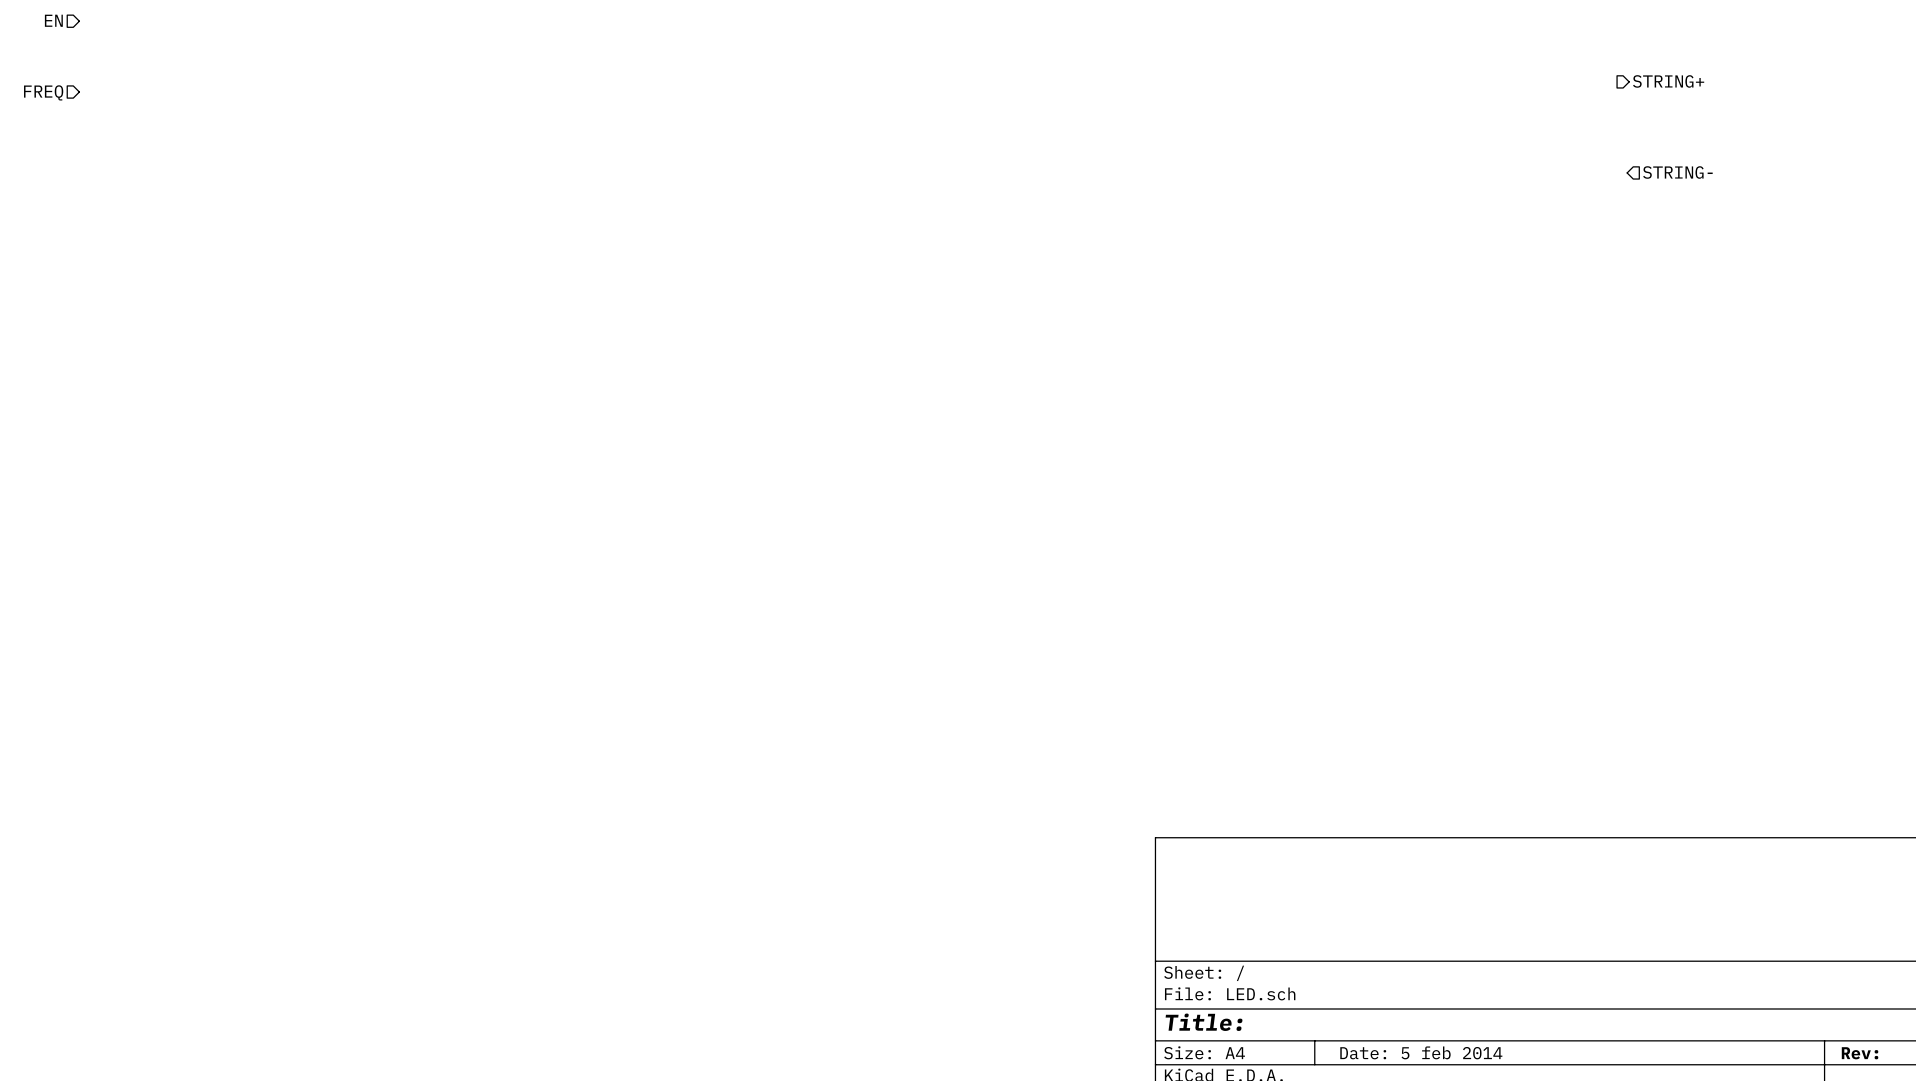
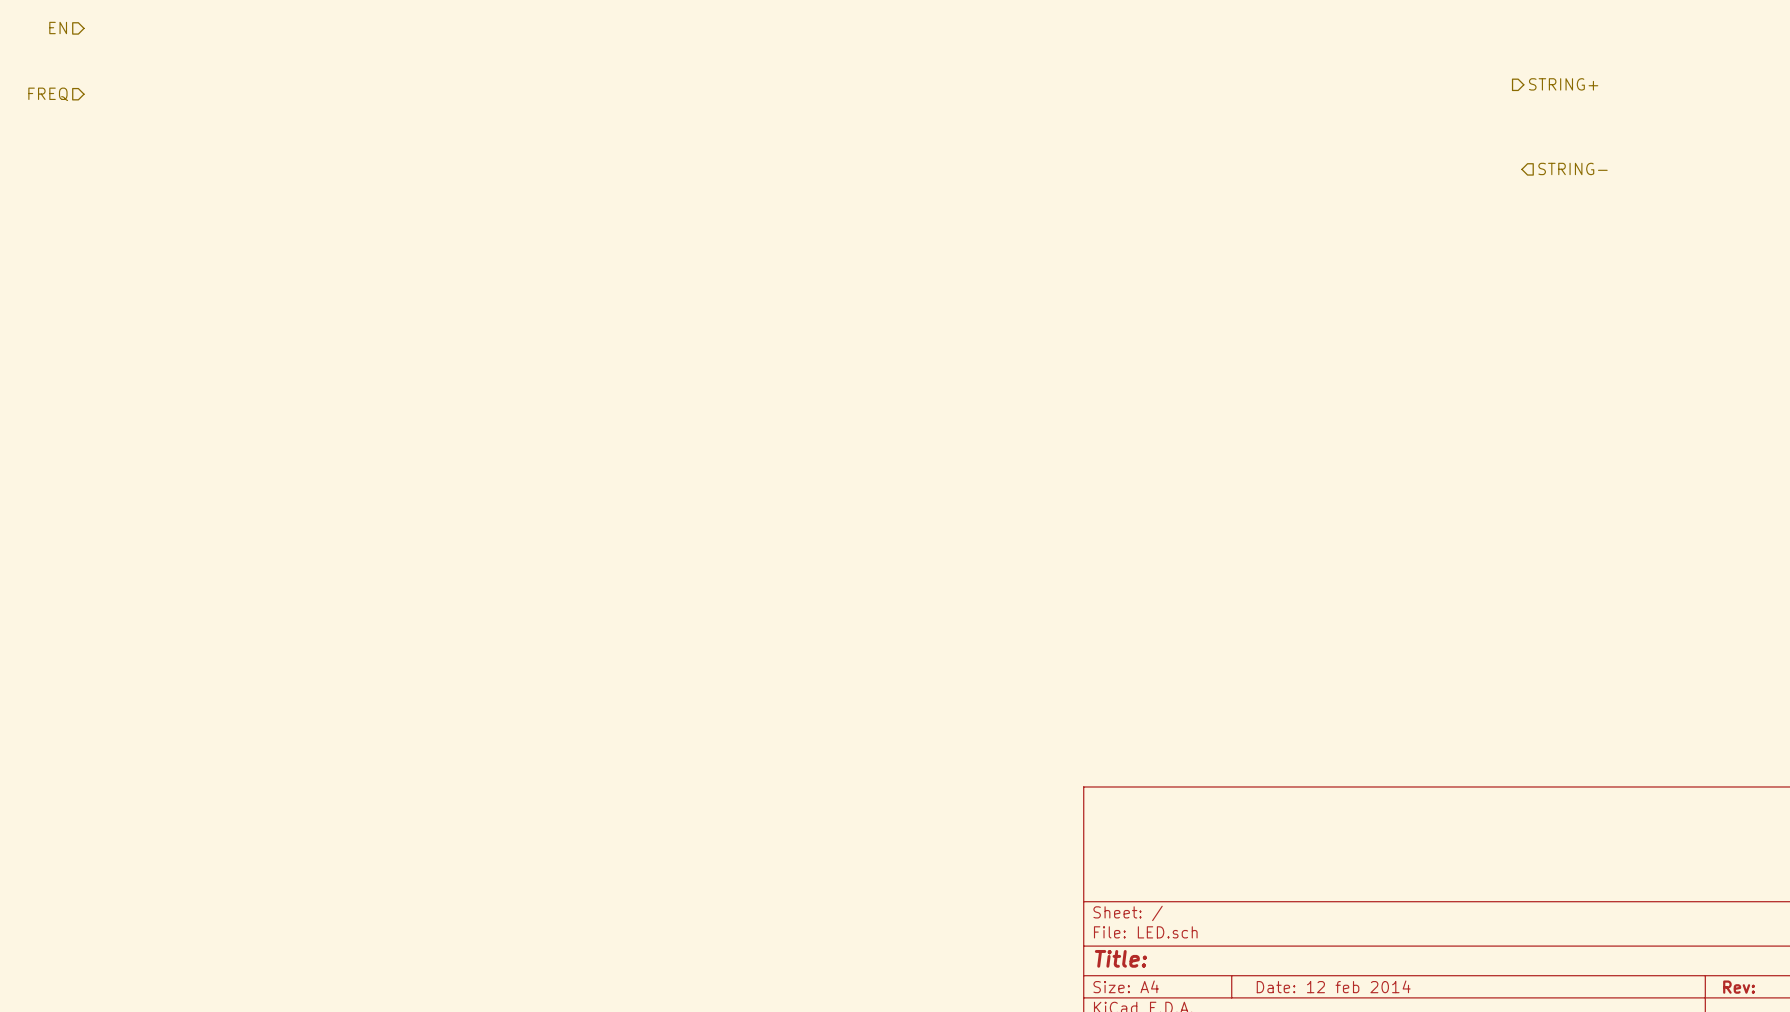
title block: Date: 5 feb 2014 (1421, 1052) -> Date: 12 feb 2014 (1333, 986)

